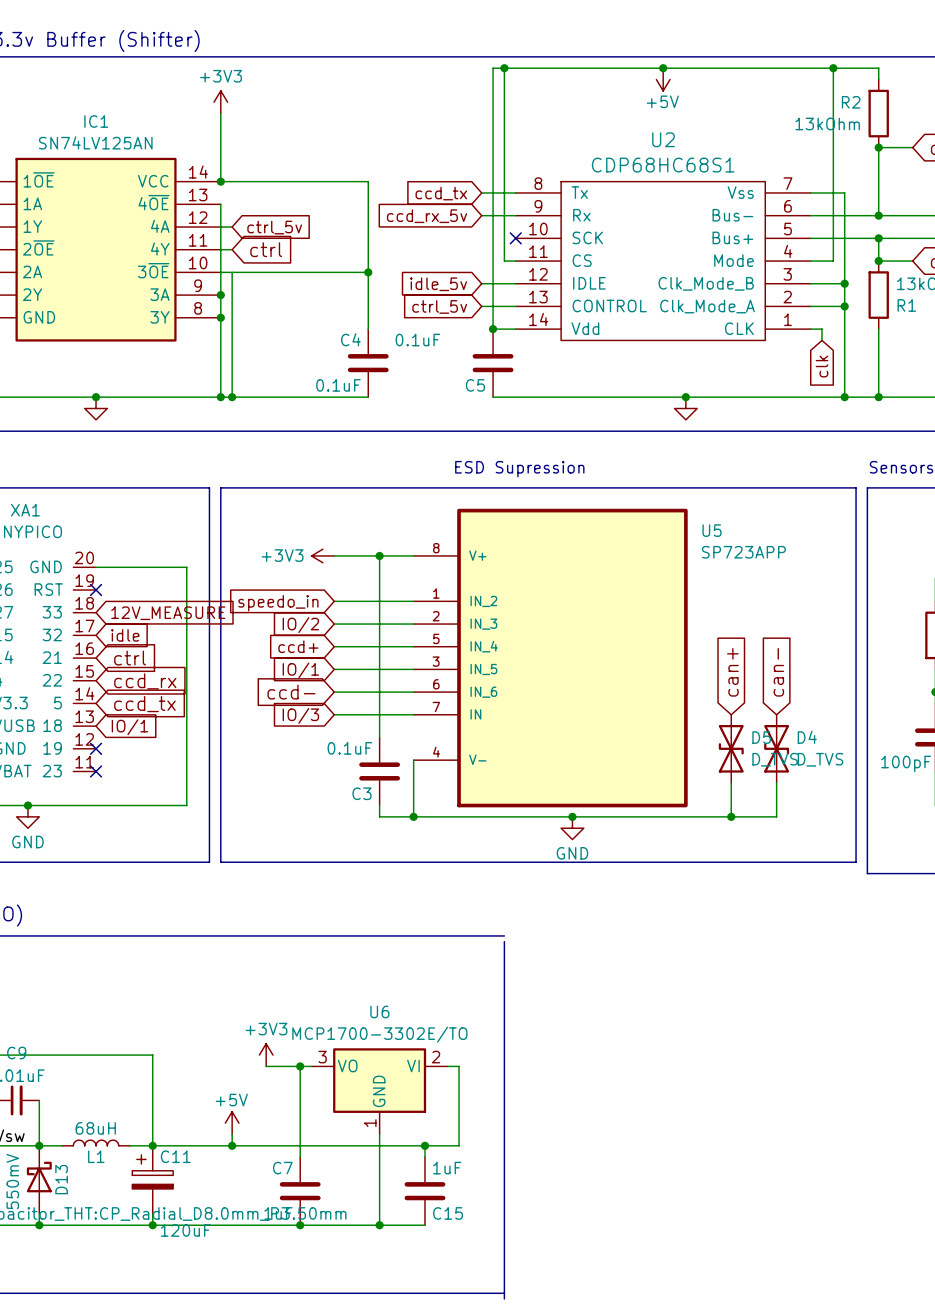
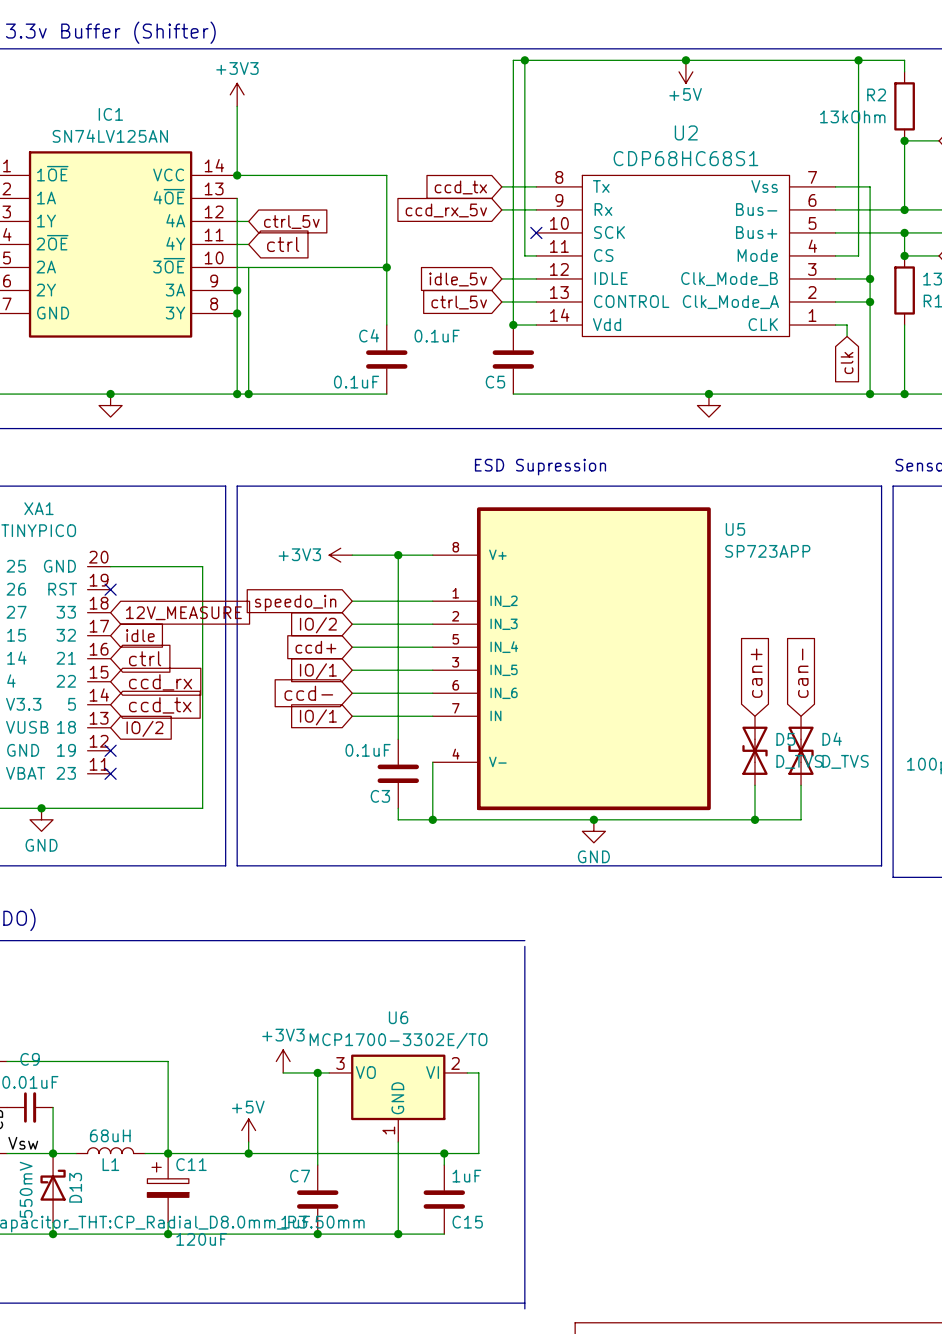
global label: IO/3 (300, 715) -> IO/1 (318, 717)
global label: IO/1 (129, 727) -> IO/2 (144, 728)

